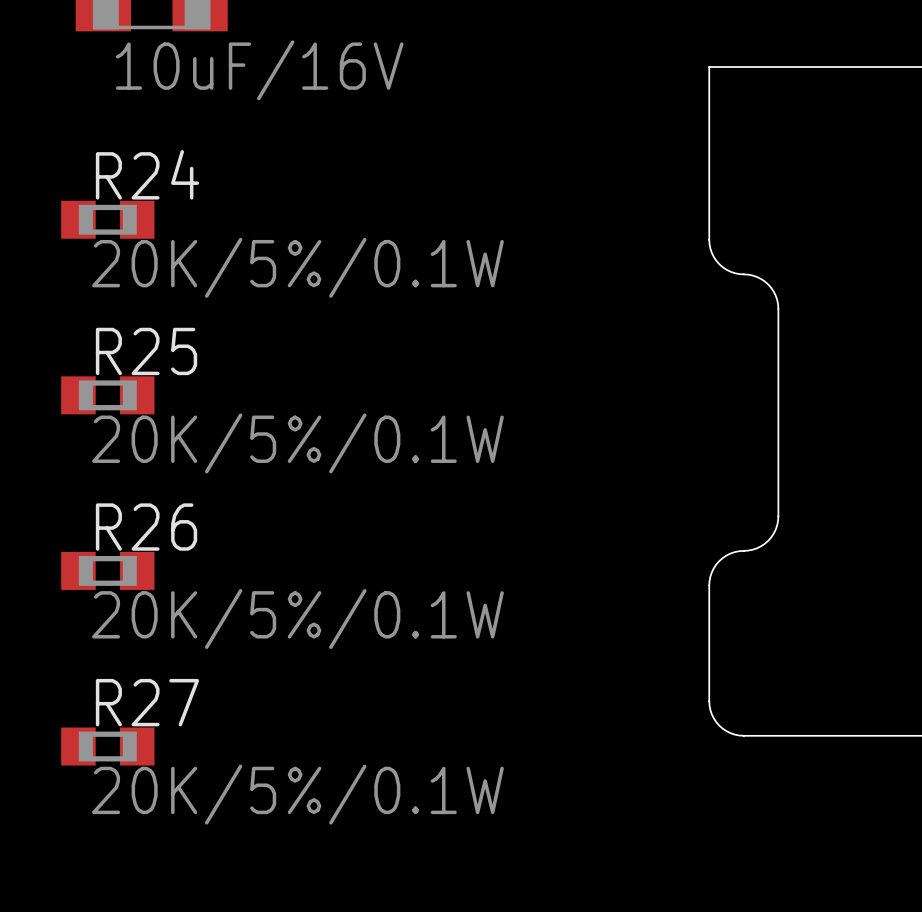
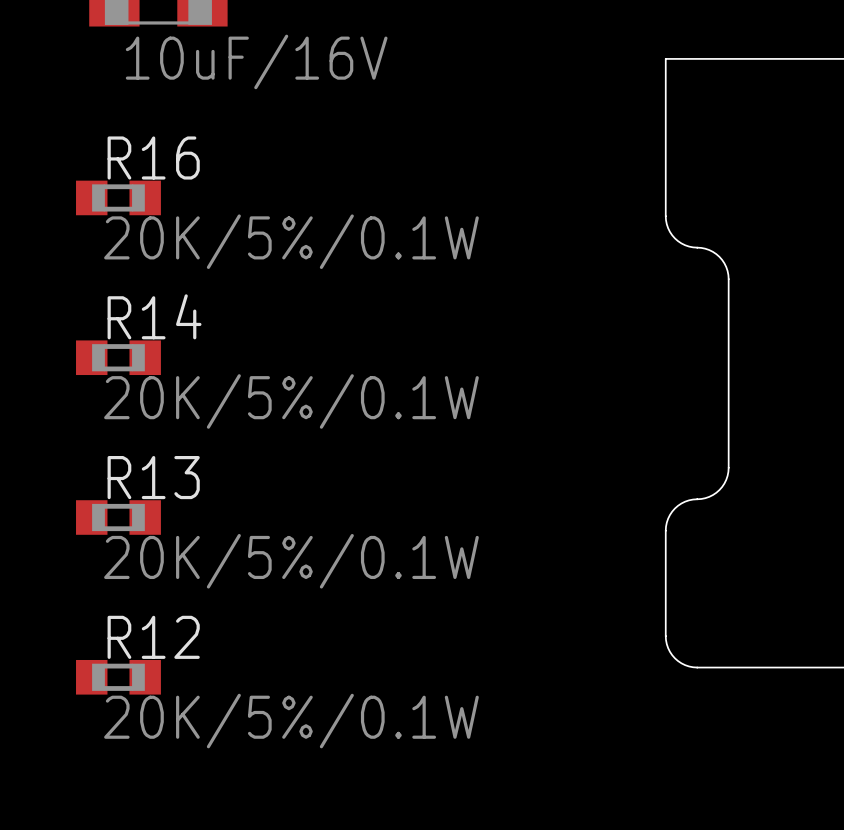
R24 name: R24 (147, 174) -> R16 (153, 158)
R25 name: R25 (146, 351) -> R14 (154, 316)
R26 name: R26 (146, 527) -> R13 (153, 477)
R27 name: R27 (147, 702) -> R12 (153, 637)

